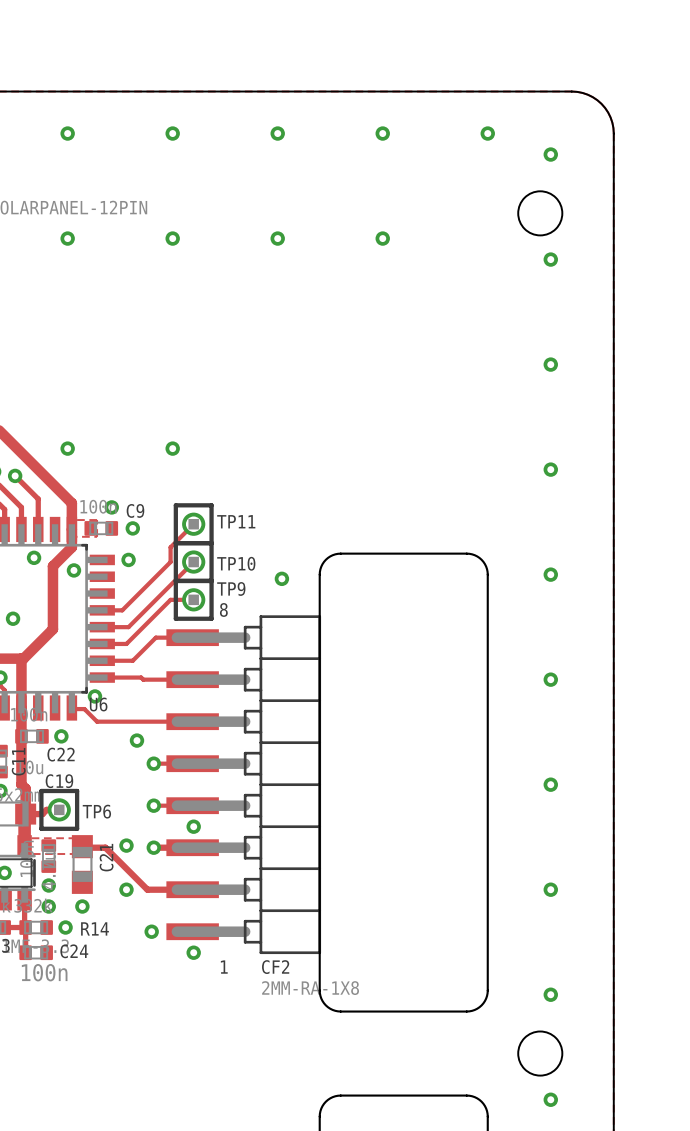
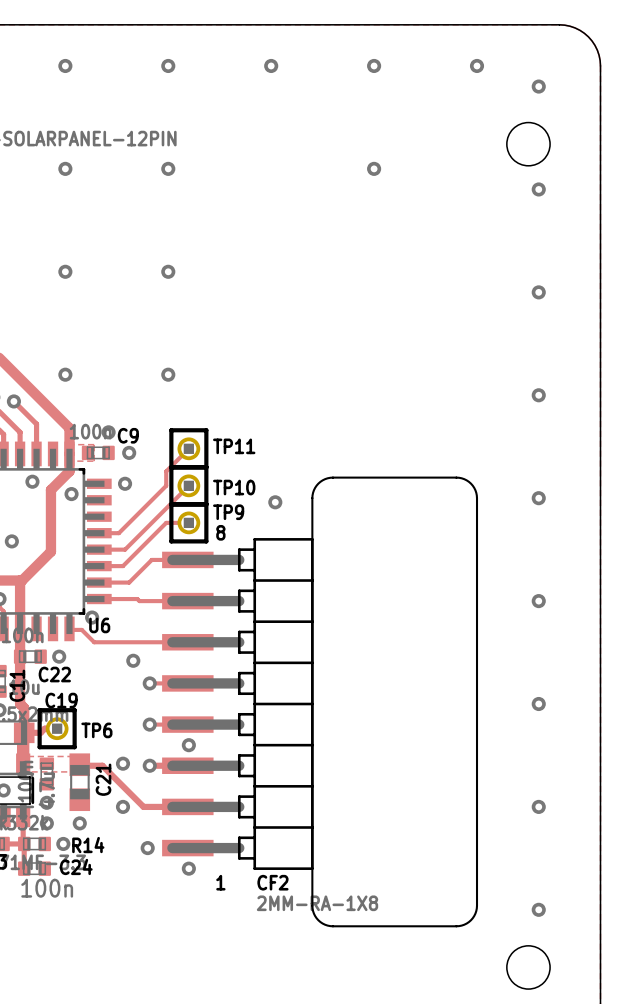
via: (277, 238) -> none
via: none -> (65, 271)
via: none -> (168, 271)

